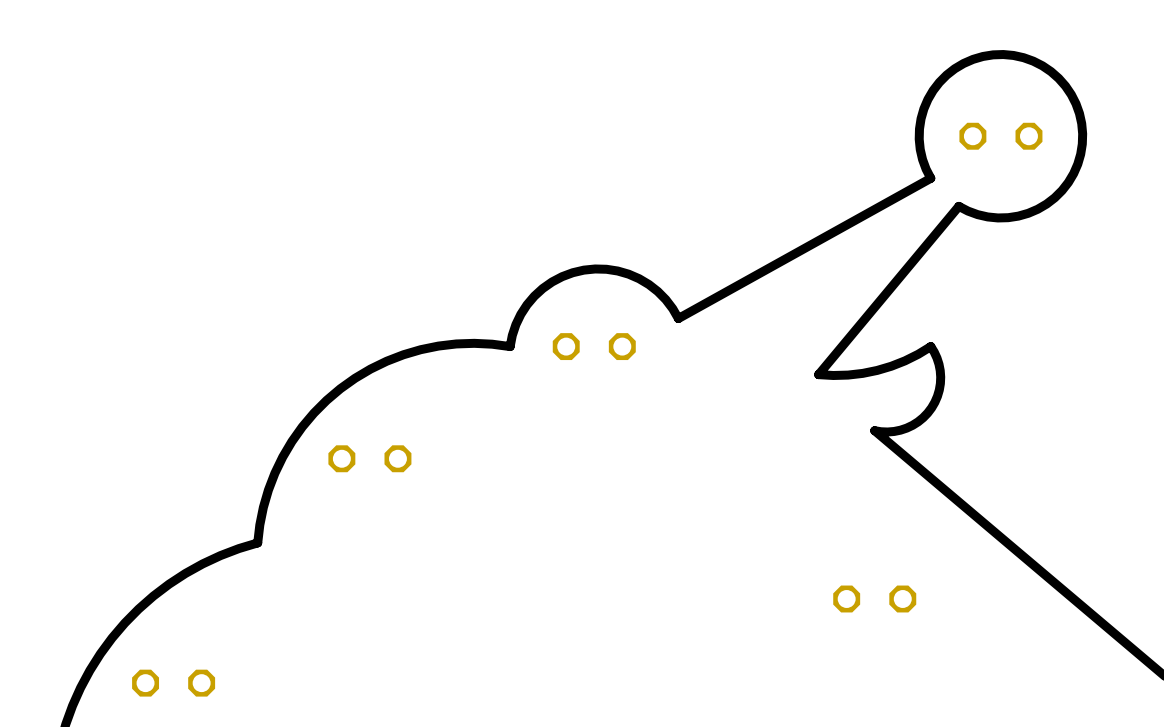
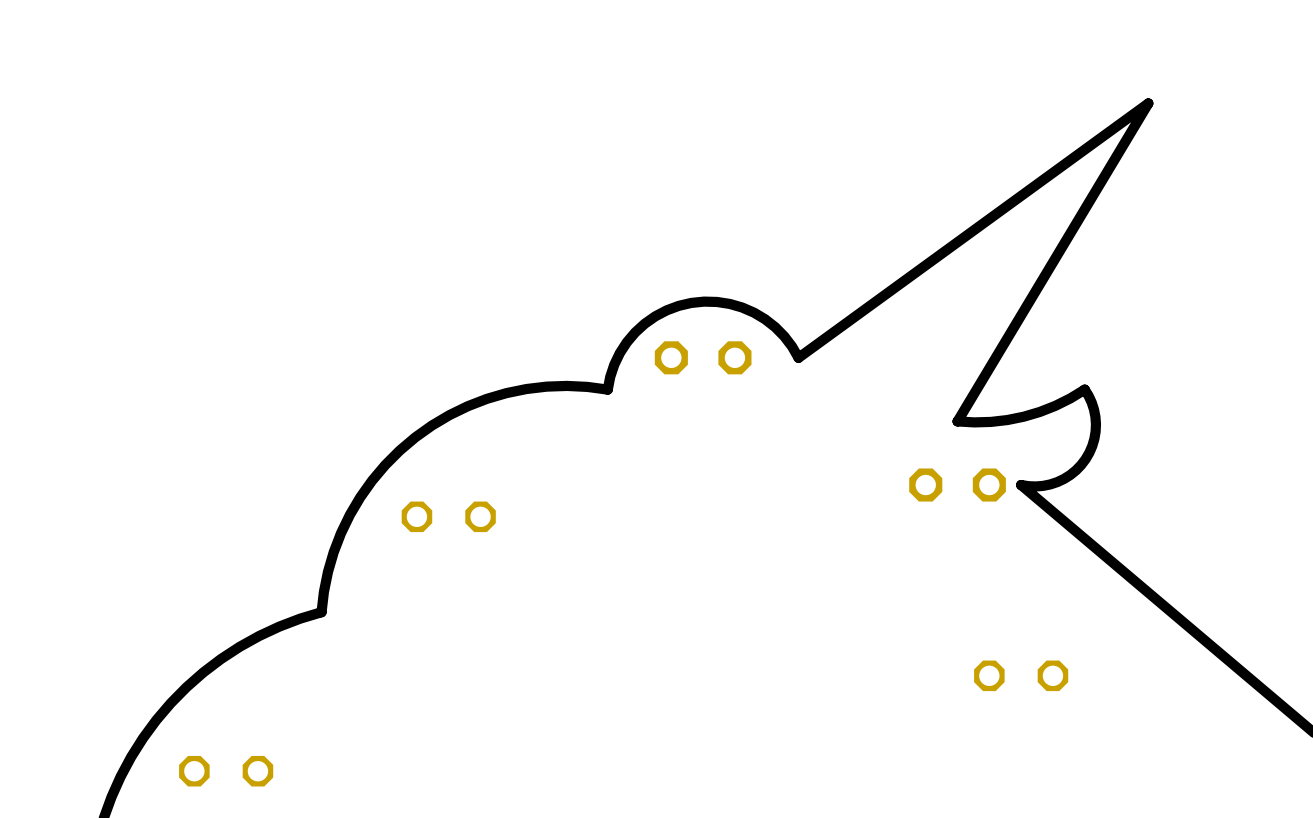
part: (1000, 136) -> none
part: none -> (703, 357)
board edge: (678, 318) (930, 178) (920, 149) (921, 118) (933, 90) (954, 68) (982, 56) (1003, 54) (1023, 57) (1051, 71) (1071, 94) (1081, 123) (1080, 154) (1068, 182) (1046, 204) (1018, 216) (987, 216) (958, 206) (818, 374) -> (798, 357) (1148, 103) (957, 421)
part: (594, 346) -> none
part: none -> (957, 485)

